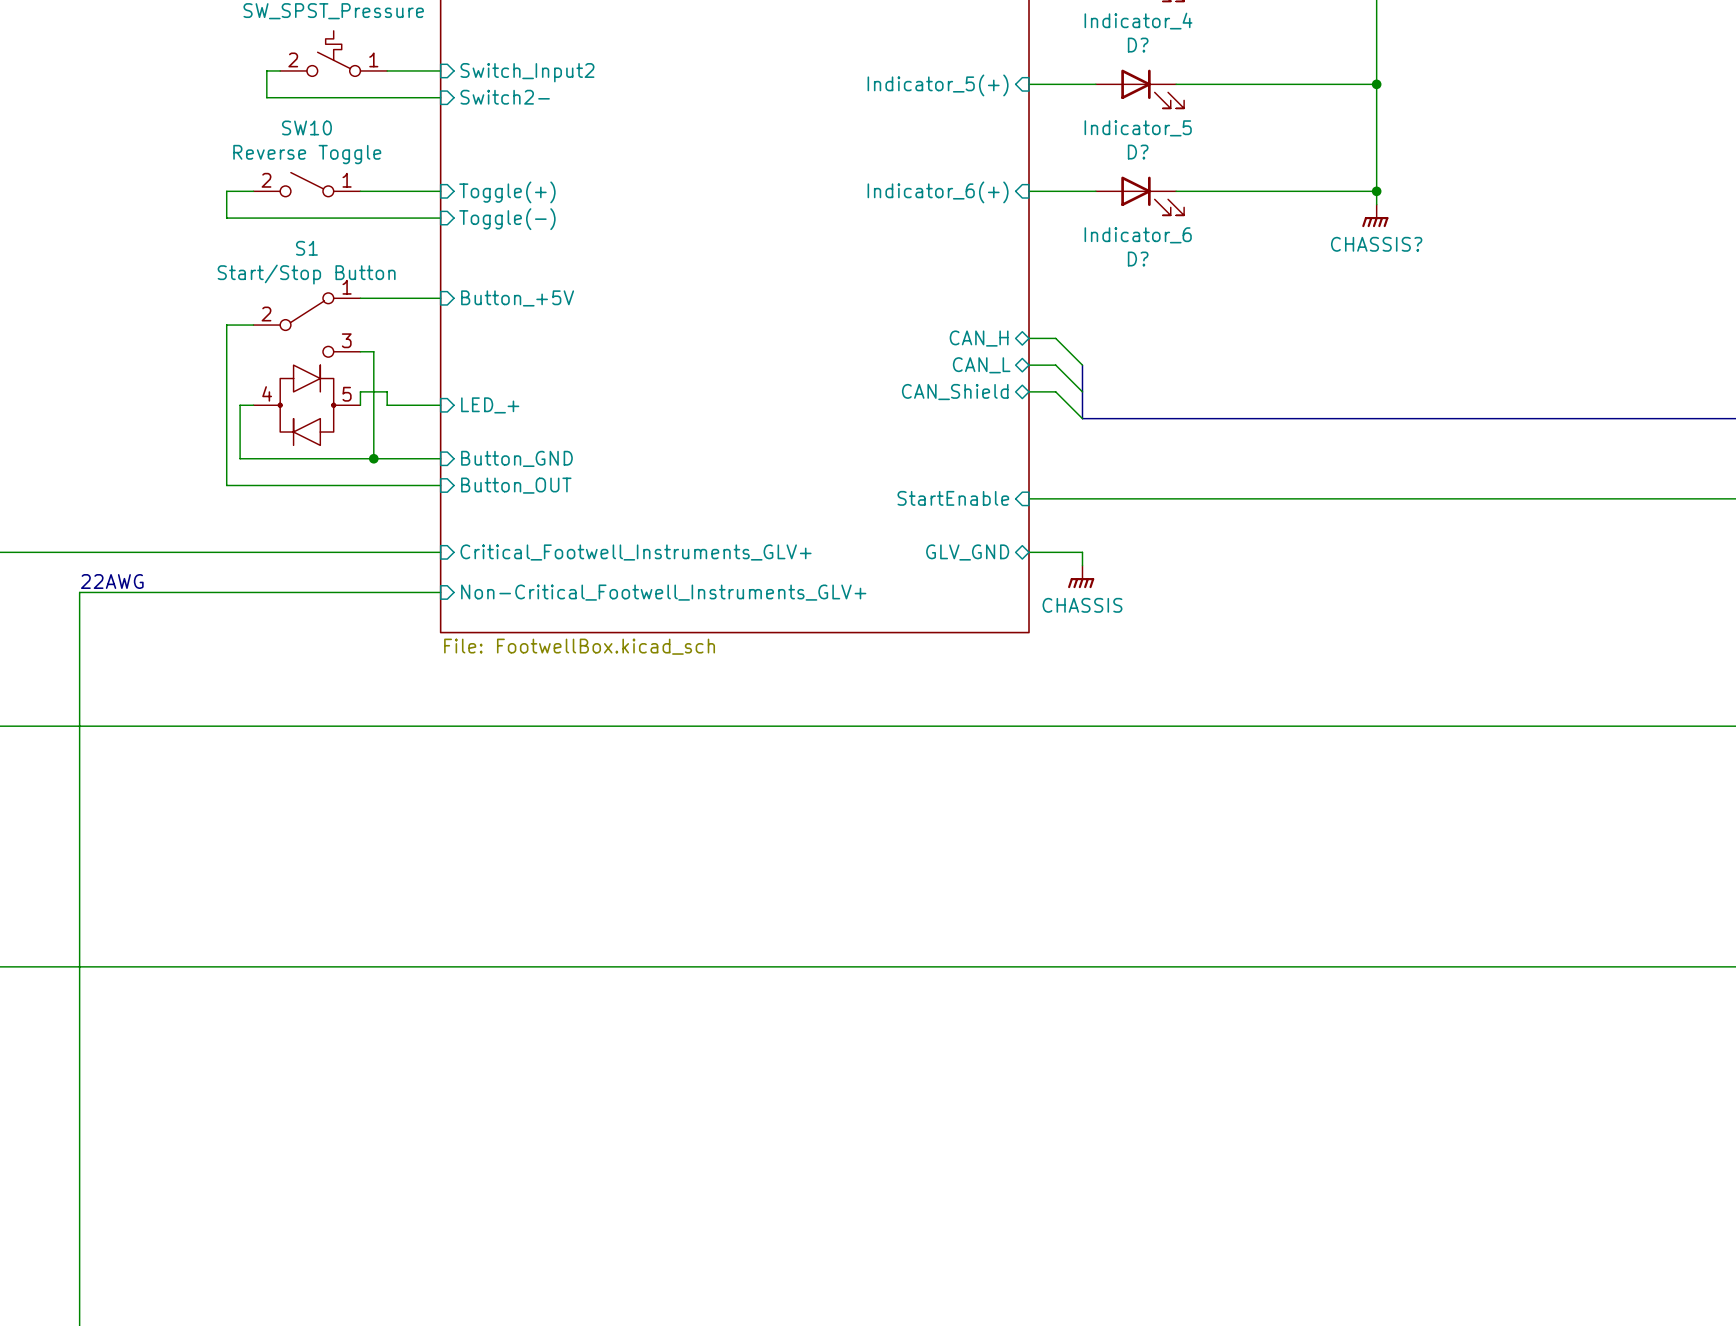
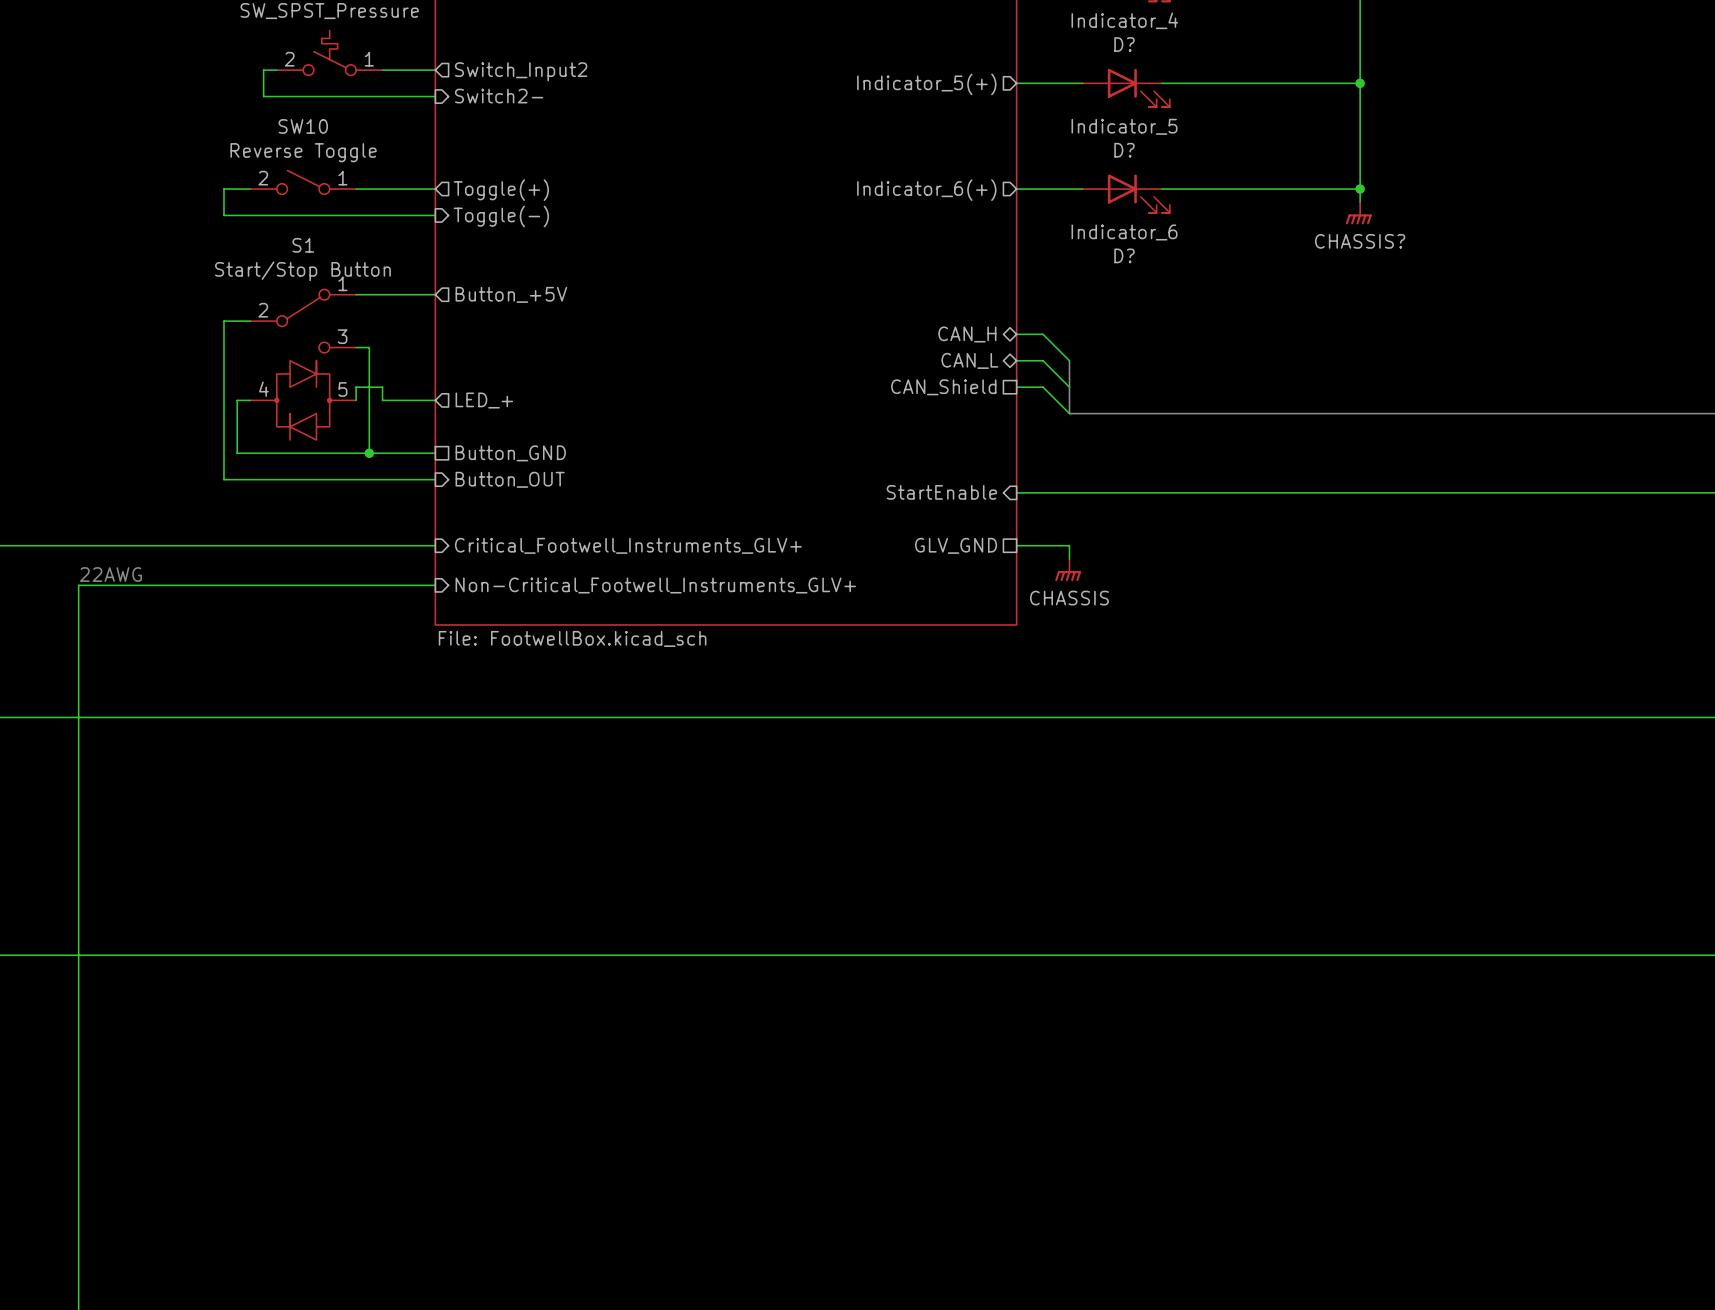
sheet pin shape: input (527, 72) -> output (521, 71)
sheet pin shape: input (938, 85) -> output (926, 84)
sheet pin shape: input (507, 192) -> output (501, 190)
sheet pin shape: input (938, 192) -> output (926, 190)
sheet pin shape: input (517, 298) -> output (511, 294)
sheet pin shape: bidirectional (955, 392) -> passive (943, 387)
sheet pin shape: input (490, 405) -> output (484, 400)
sheet pin shape: input (516, 458) -> passive (510, 453)
sheet pin shape: bidirectional (967, 552) -> passive (956, 545)

